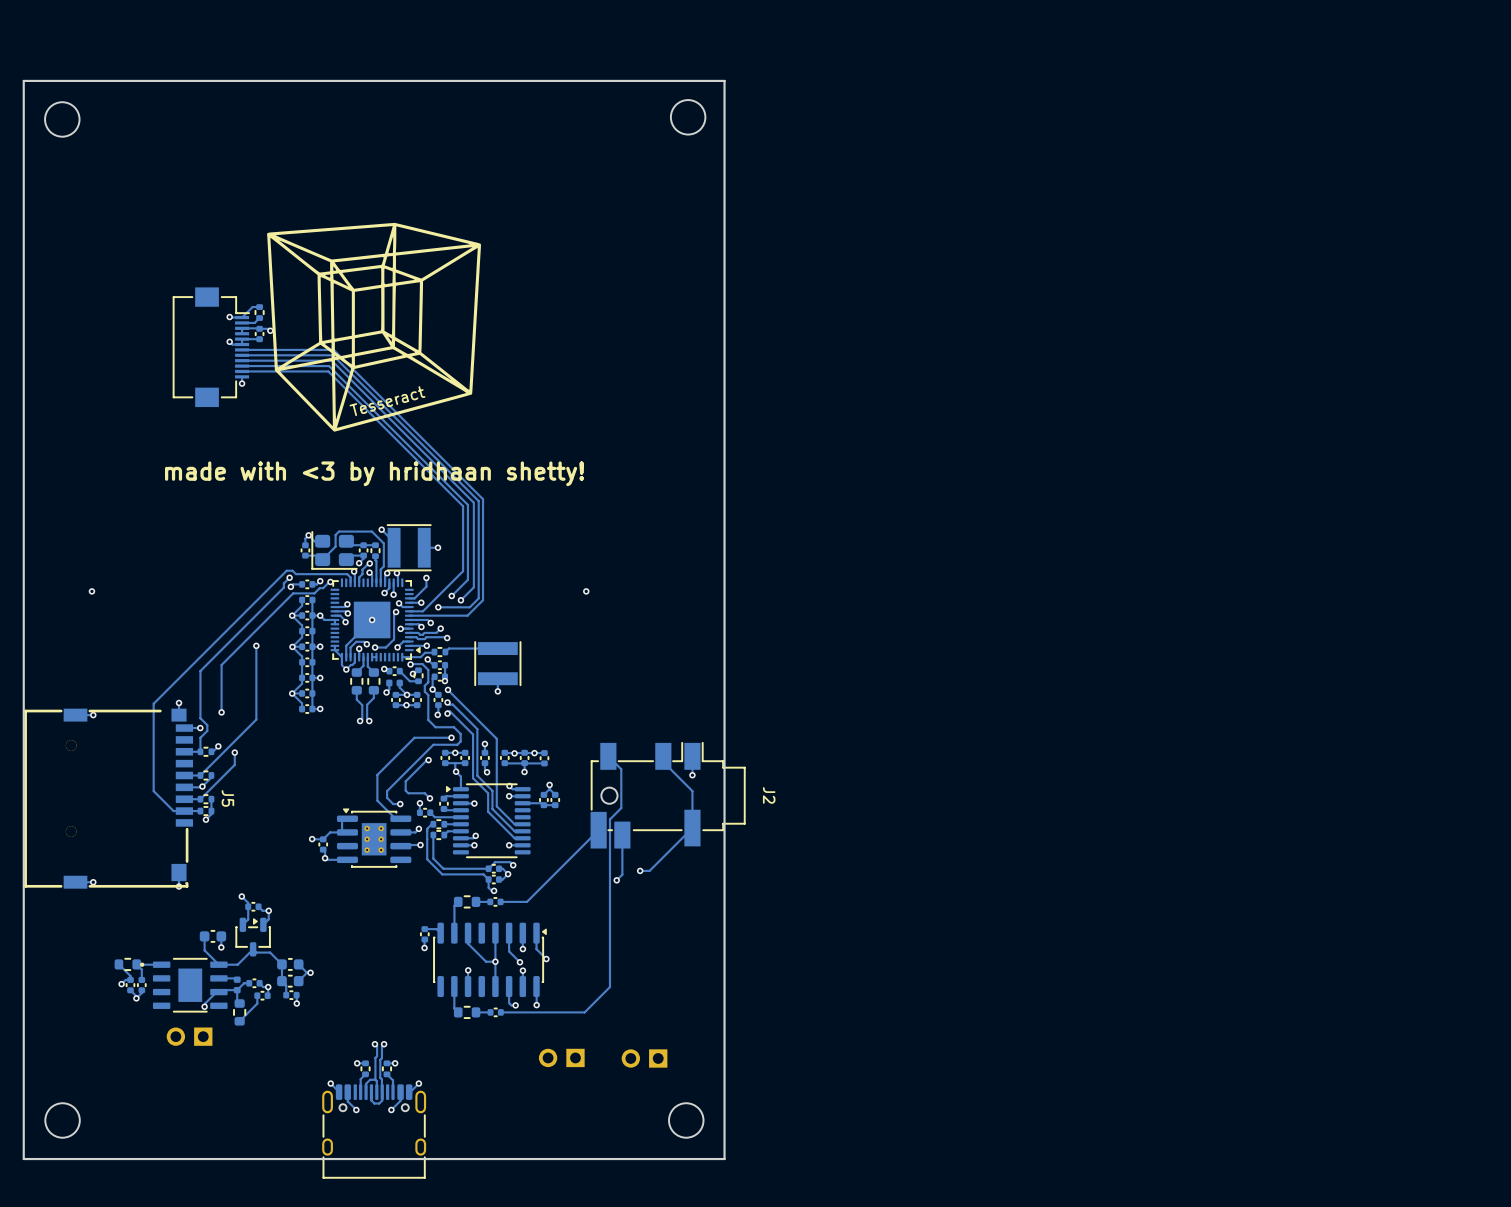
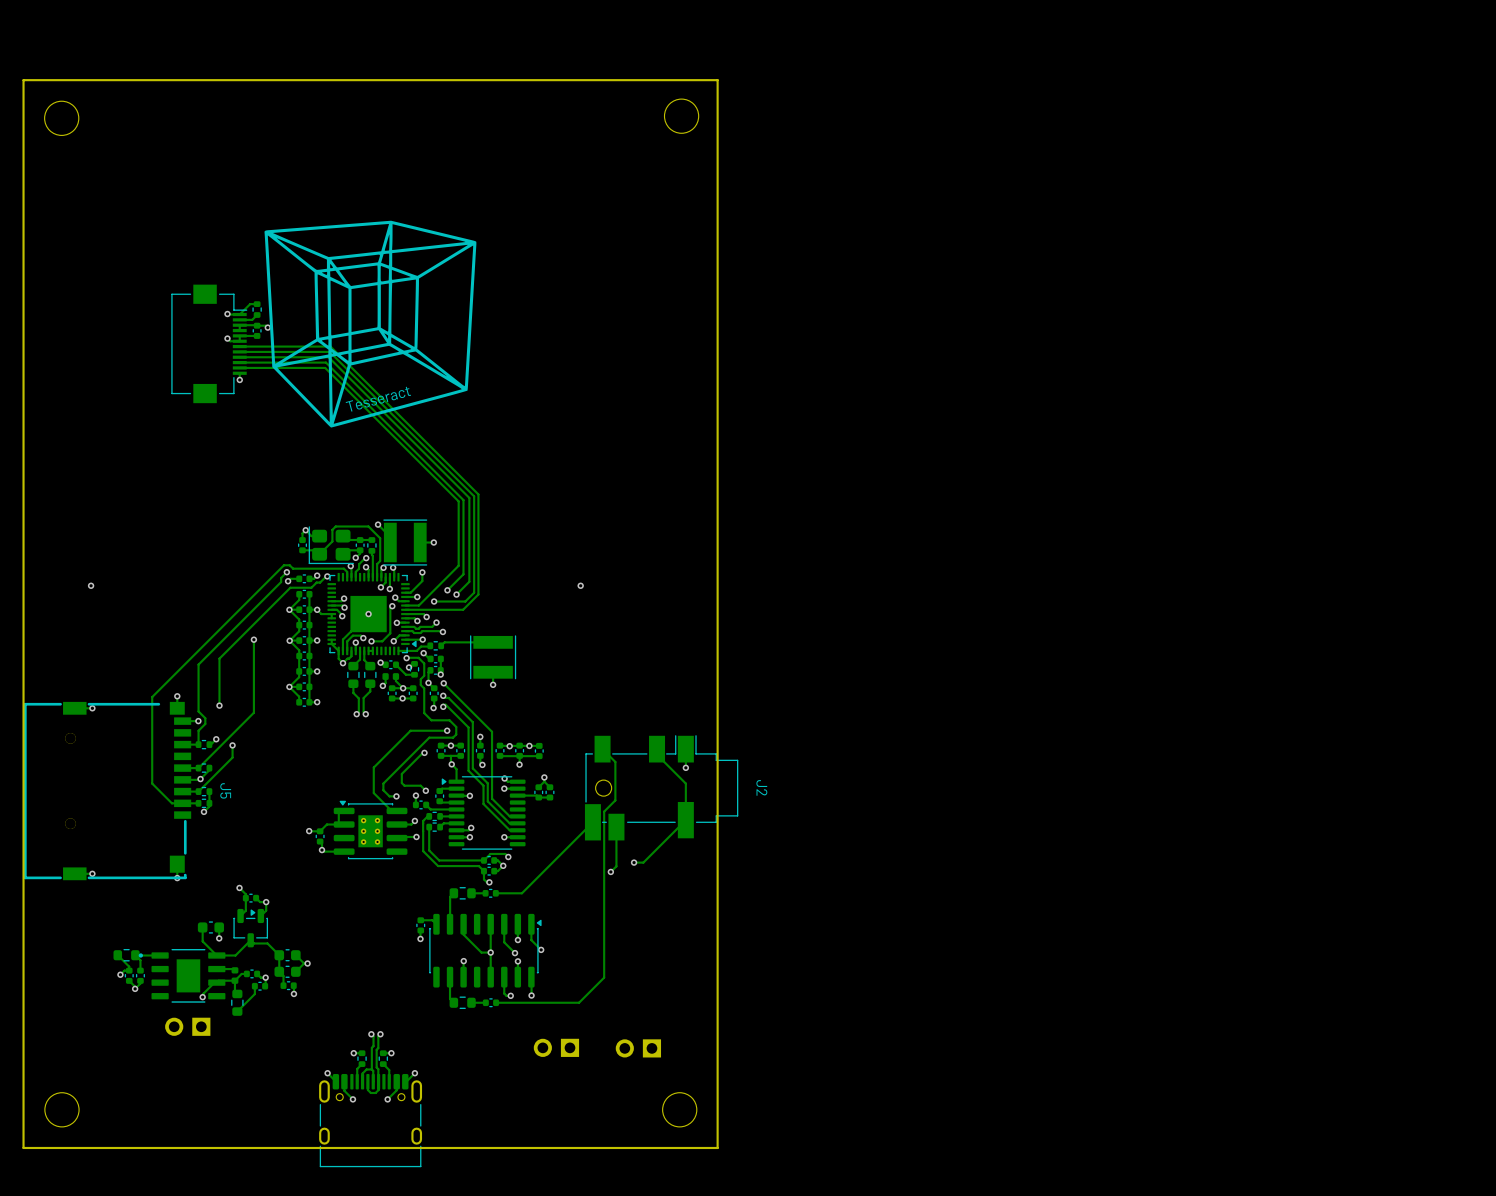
text: made with <3 by hridhaan shetty! (374, 473) -> none

